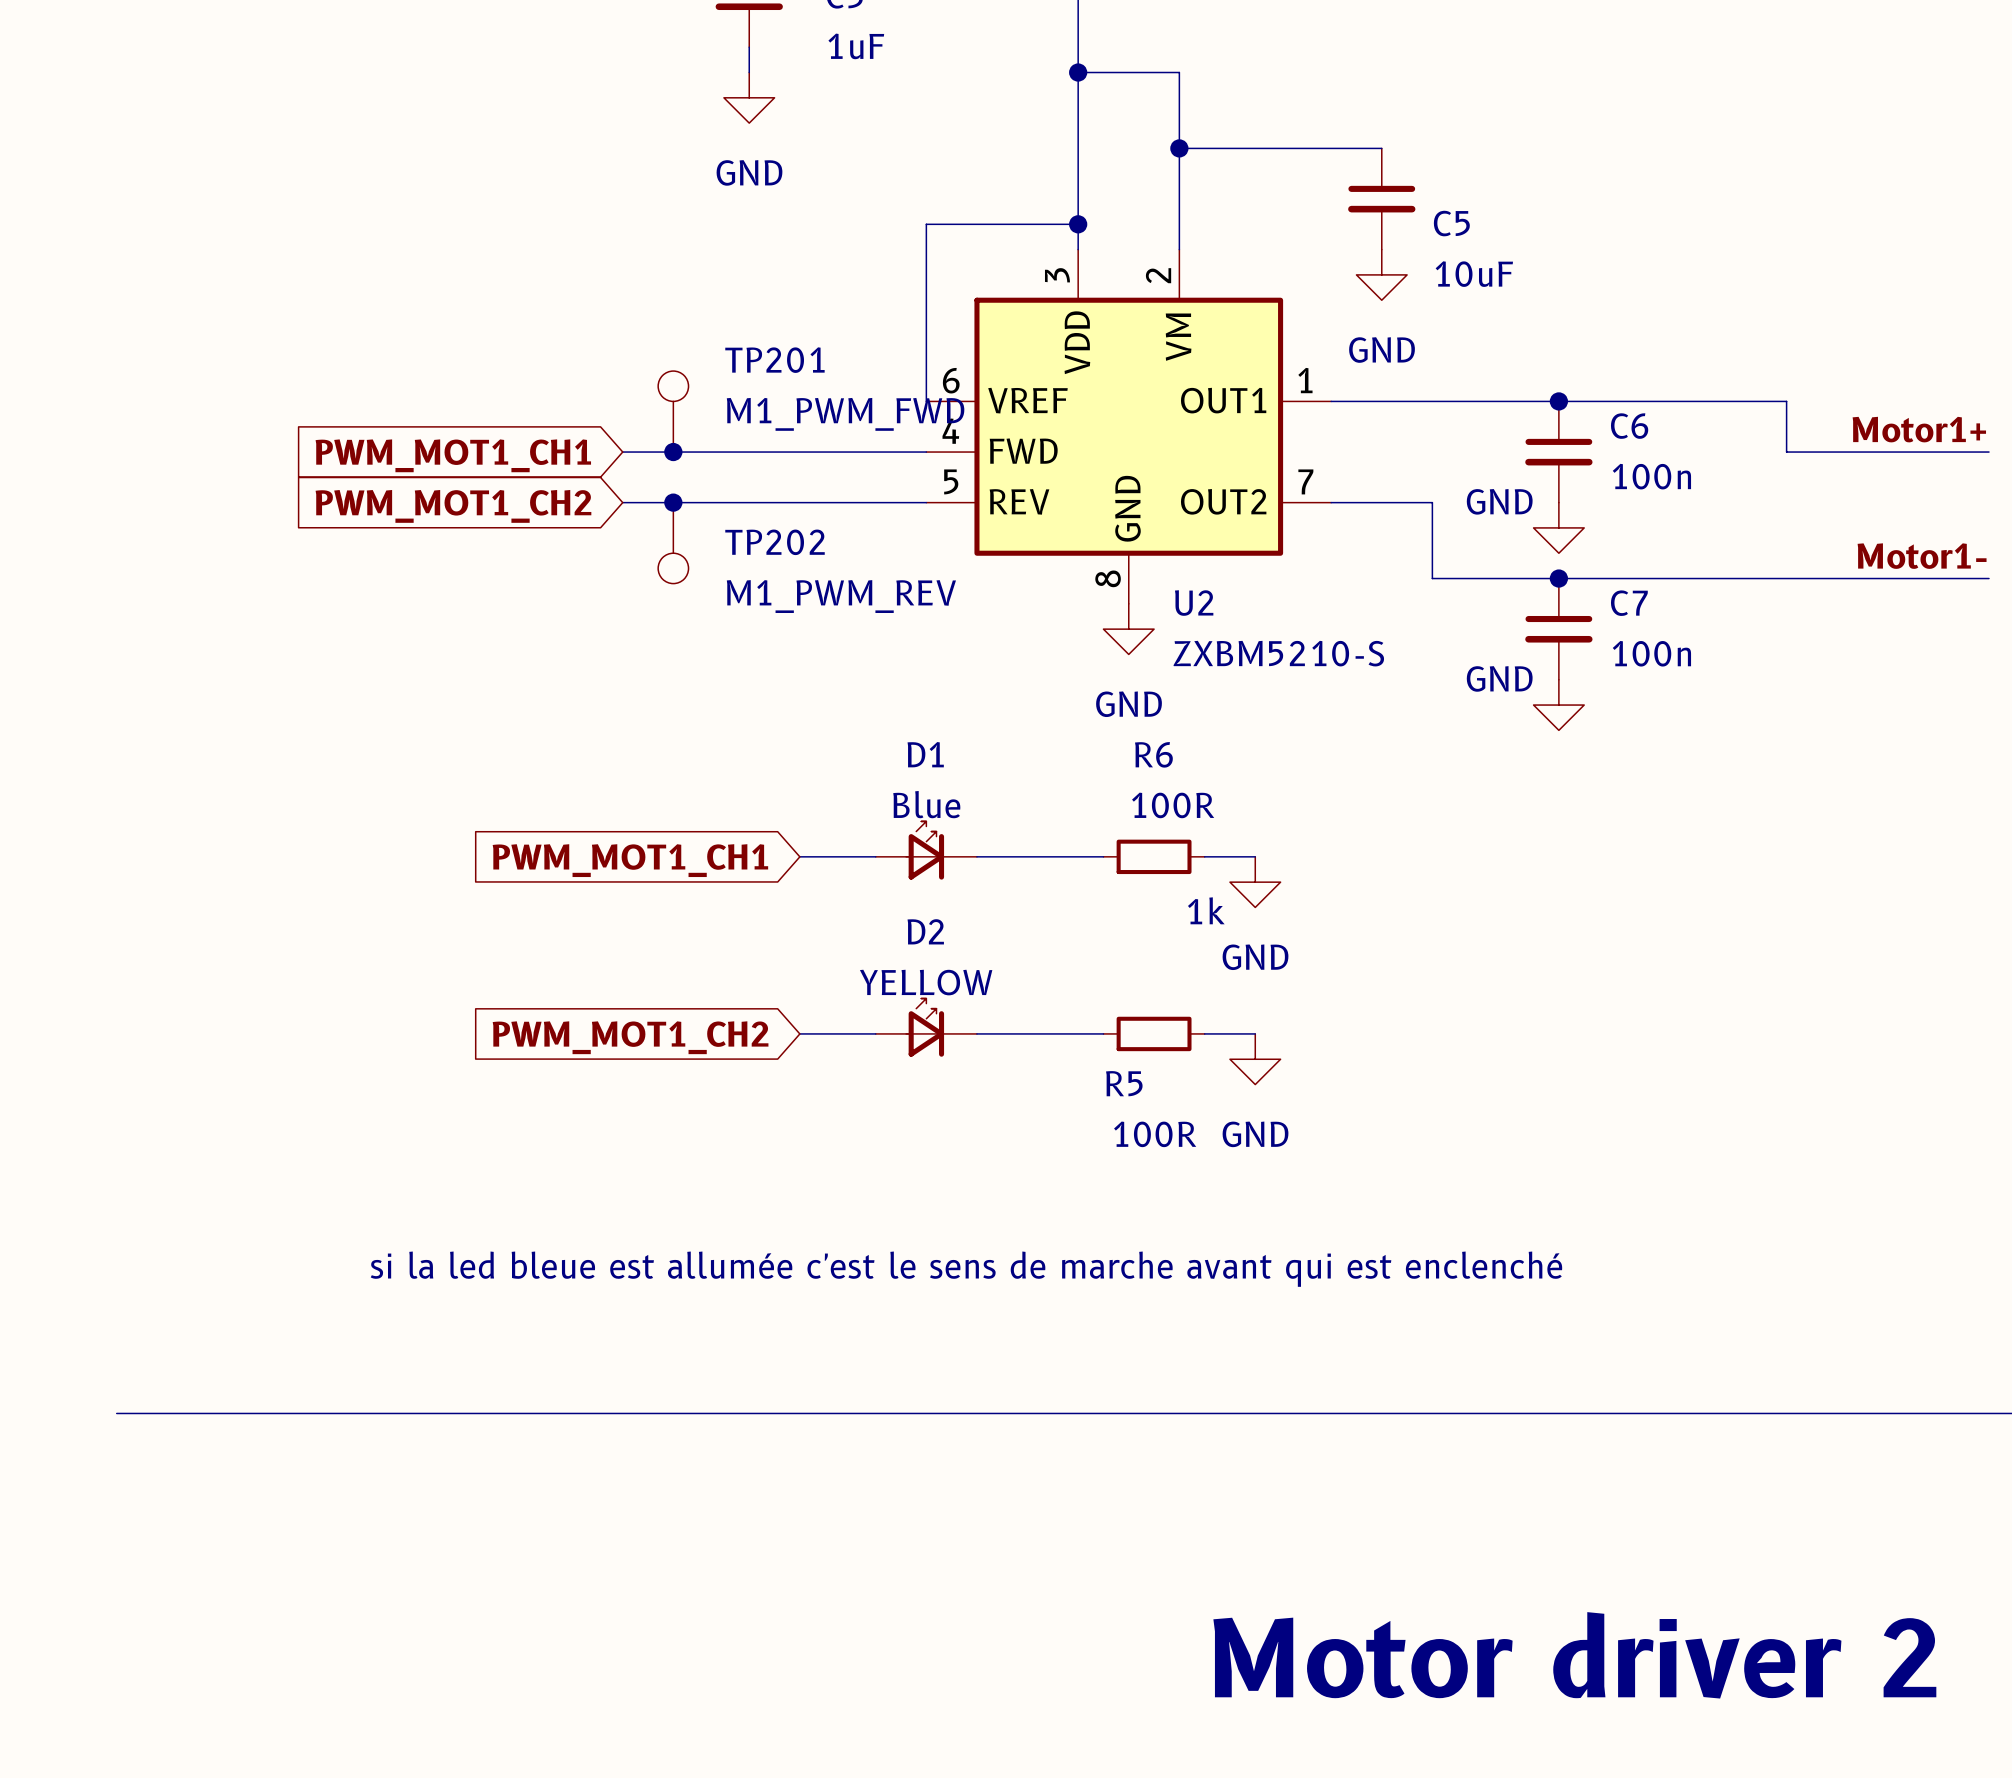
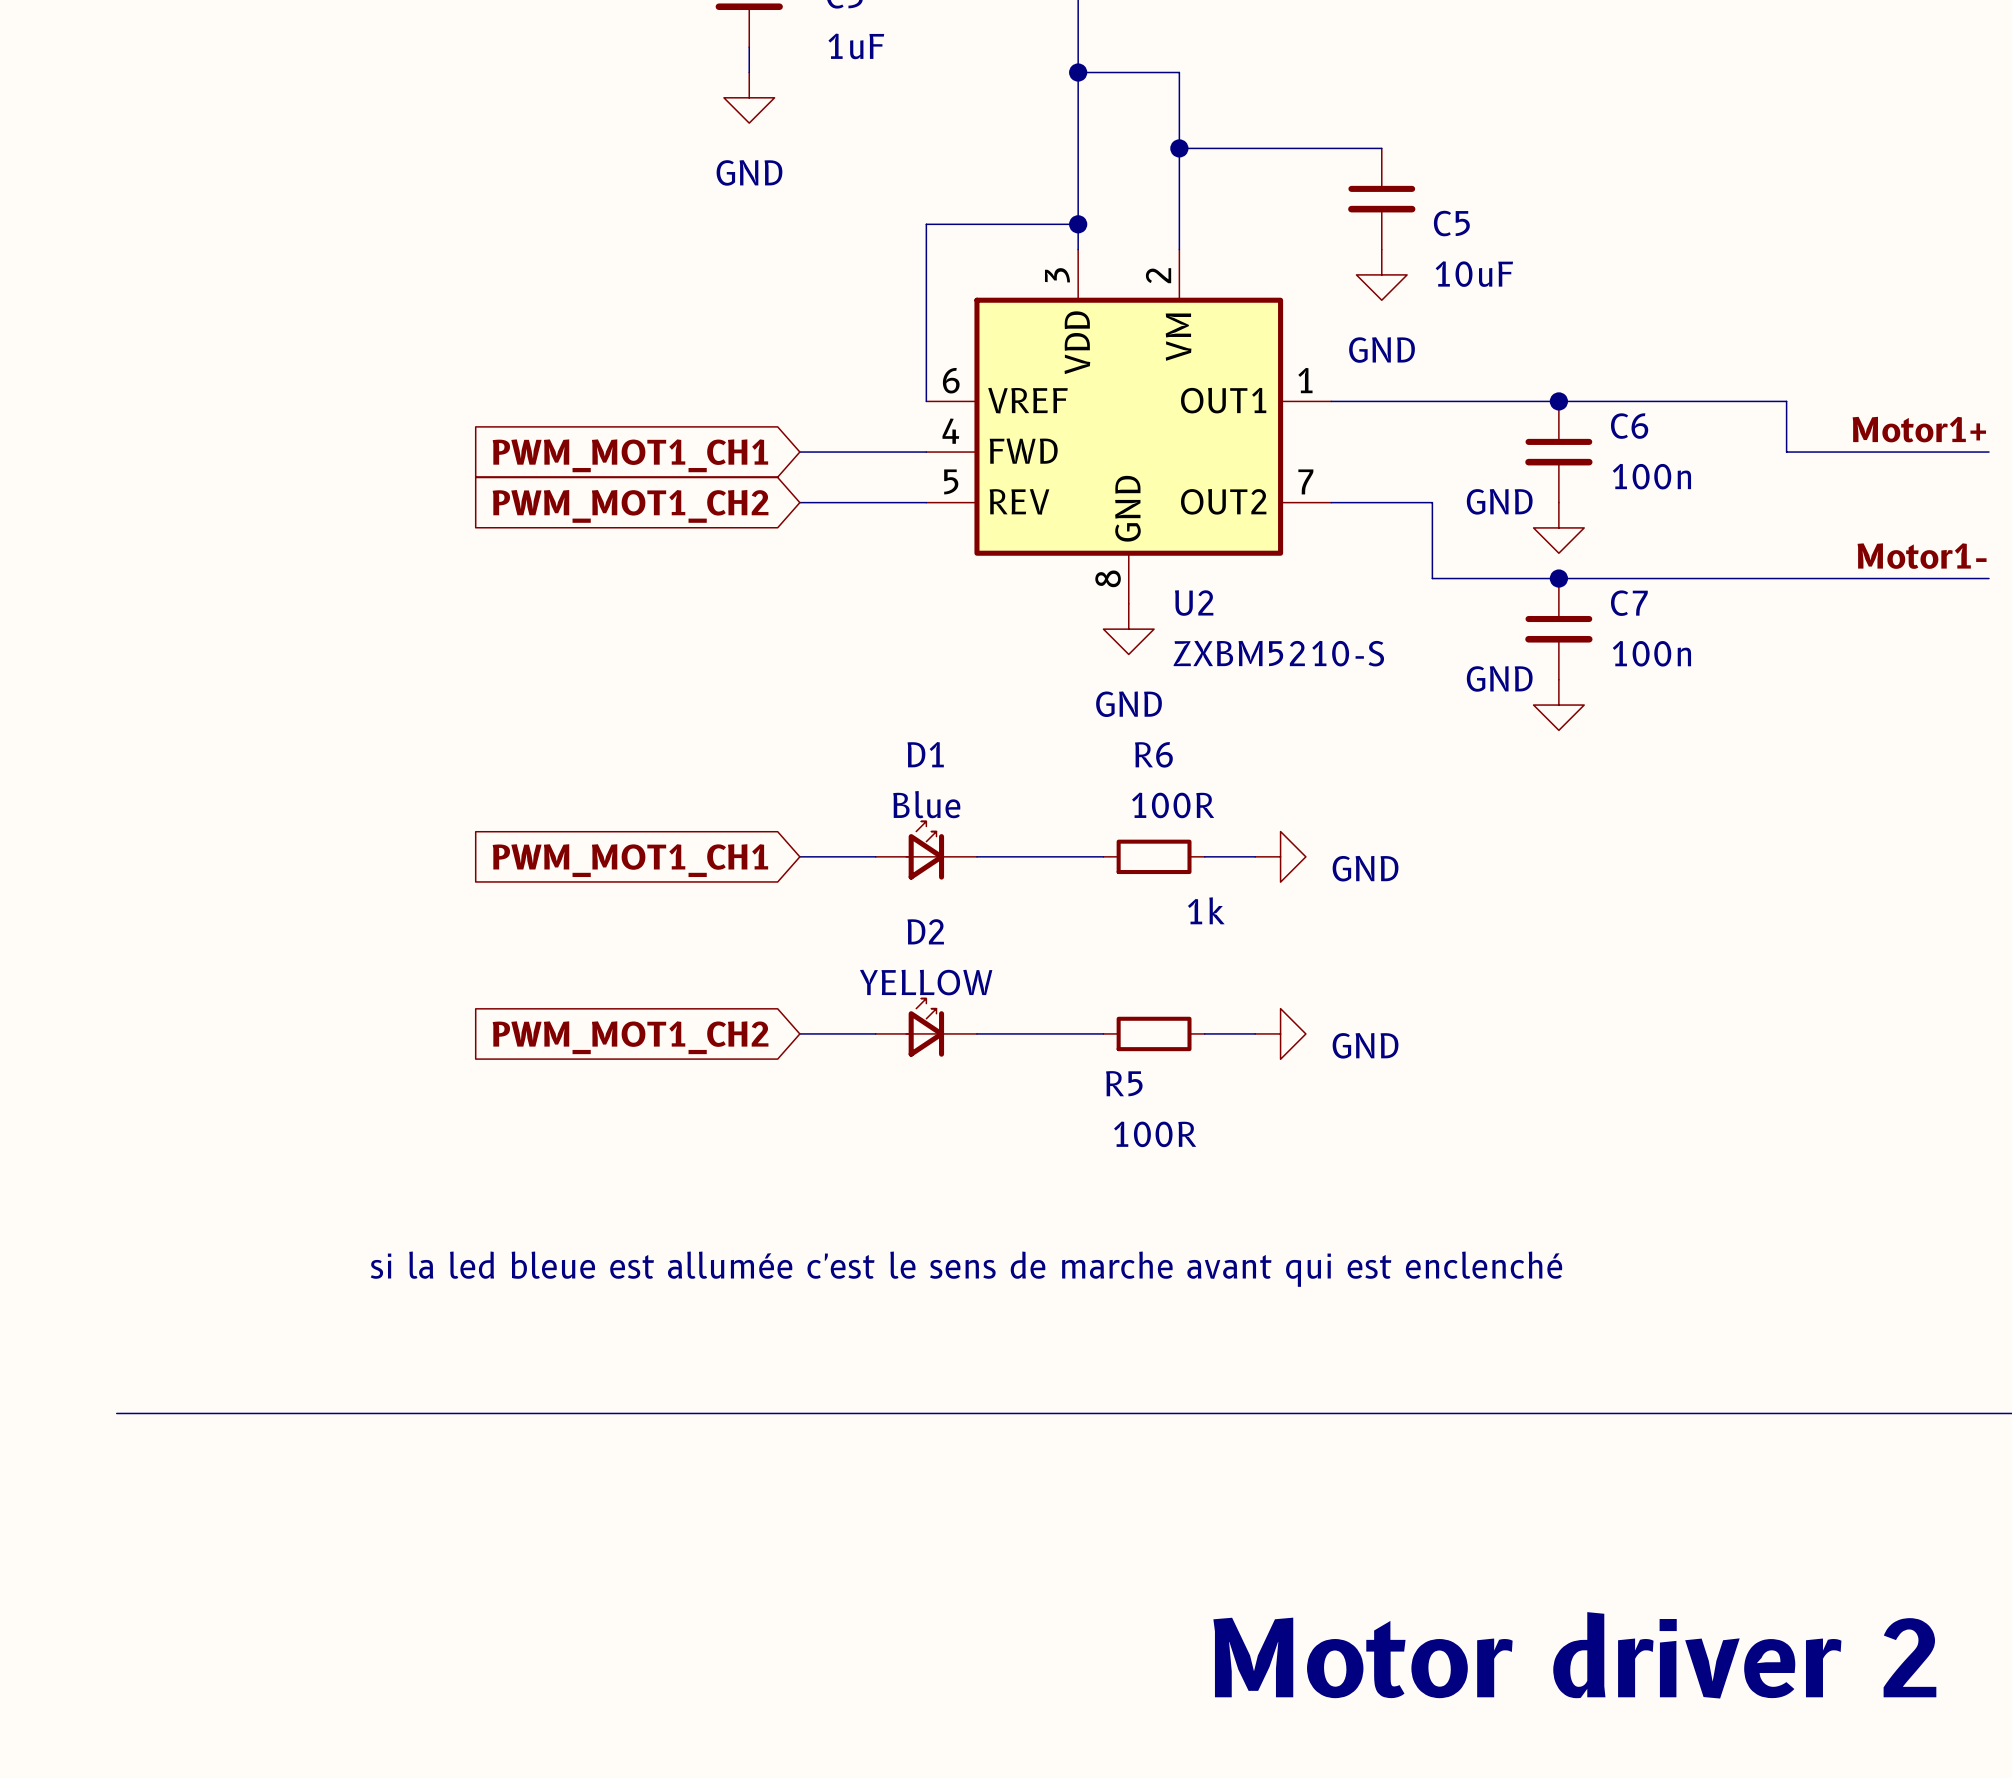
TP201: M1_PWM_FWD (673, 411) -> none
wire: (622, 452) (799, 452) -> none
junction: (673, 452) -> none
global label position: PWM_MOT1_CH1 (453, 455) -> PWM_MOT1_CH1 (630, 455)
wire: (622, 502) (799, 502) -> none
junction: (673, 502) -> none
global label position: PWM_MOT1_CH2 (453, 506) -> PWM_MOT1_CH2 (630, 506)
TP202: M1_PWM_REV (673, 543) -> none
power symbol rotation: 0° (1255, 882) -> 90° counterclockwise (1280, 856)
power symbol position: GND (1255, 882) -> GND (1280, 856)
power symbol rotation: 0° (1255, 1059) -> 90° counterclockwise (1280, 1033)
power symbol position: GND (1255, 1059) -> GND (1280, 1033)

